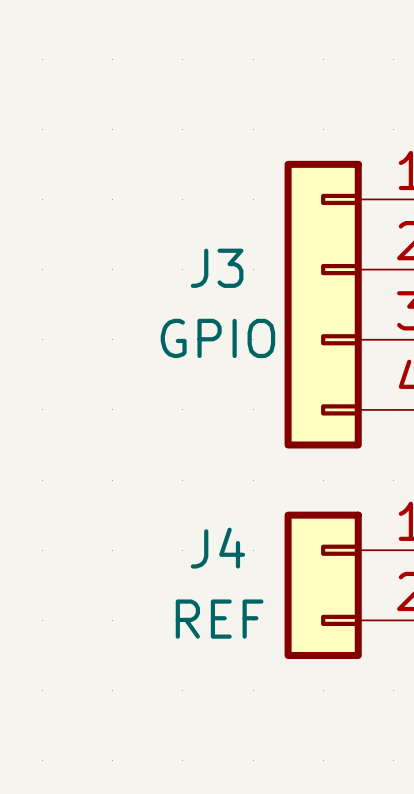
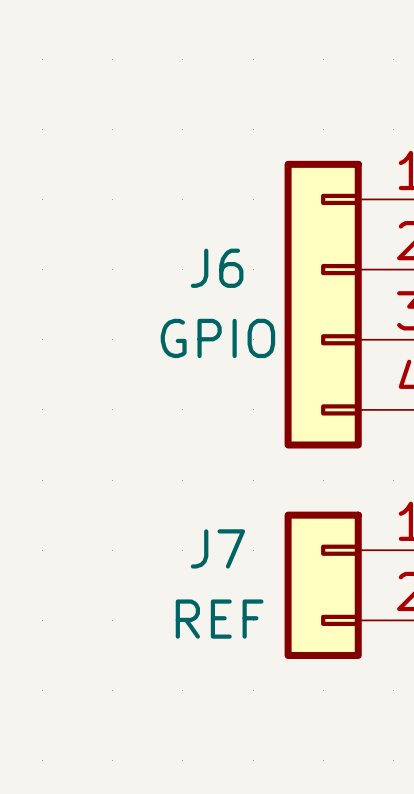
J3 name: J3 (217, 268) -> J6 (217, 268)
J4 name: J4 (217, 548) -> J7 (217, 548)

